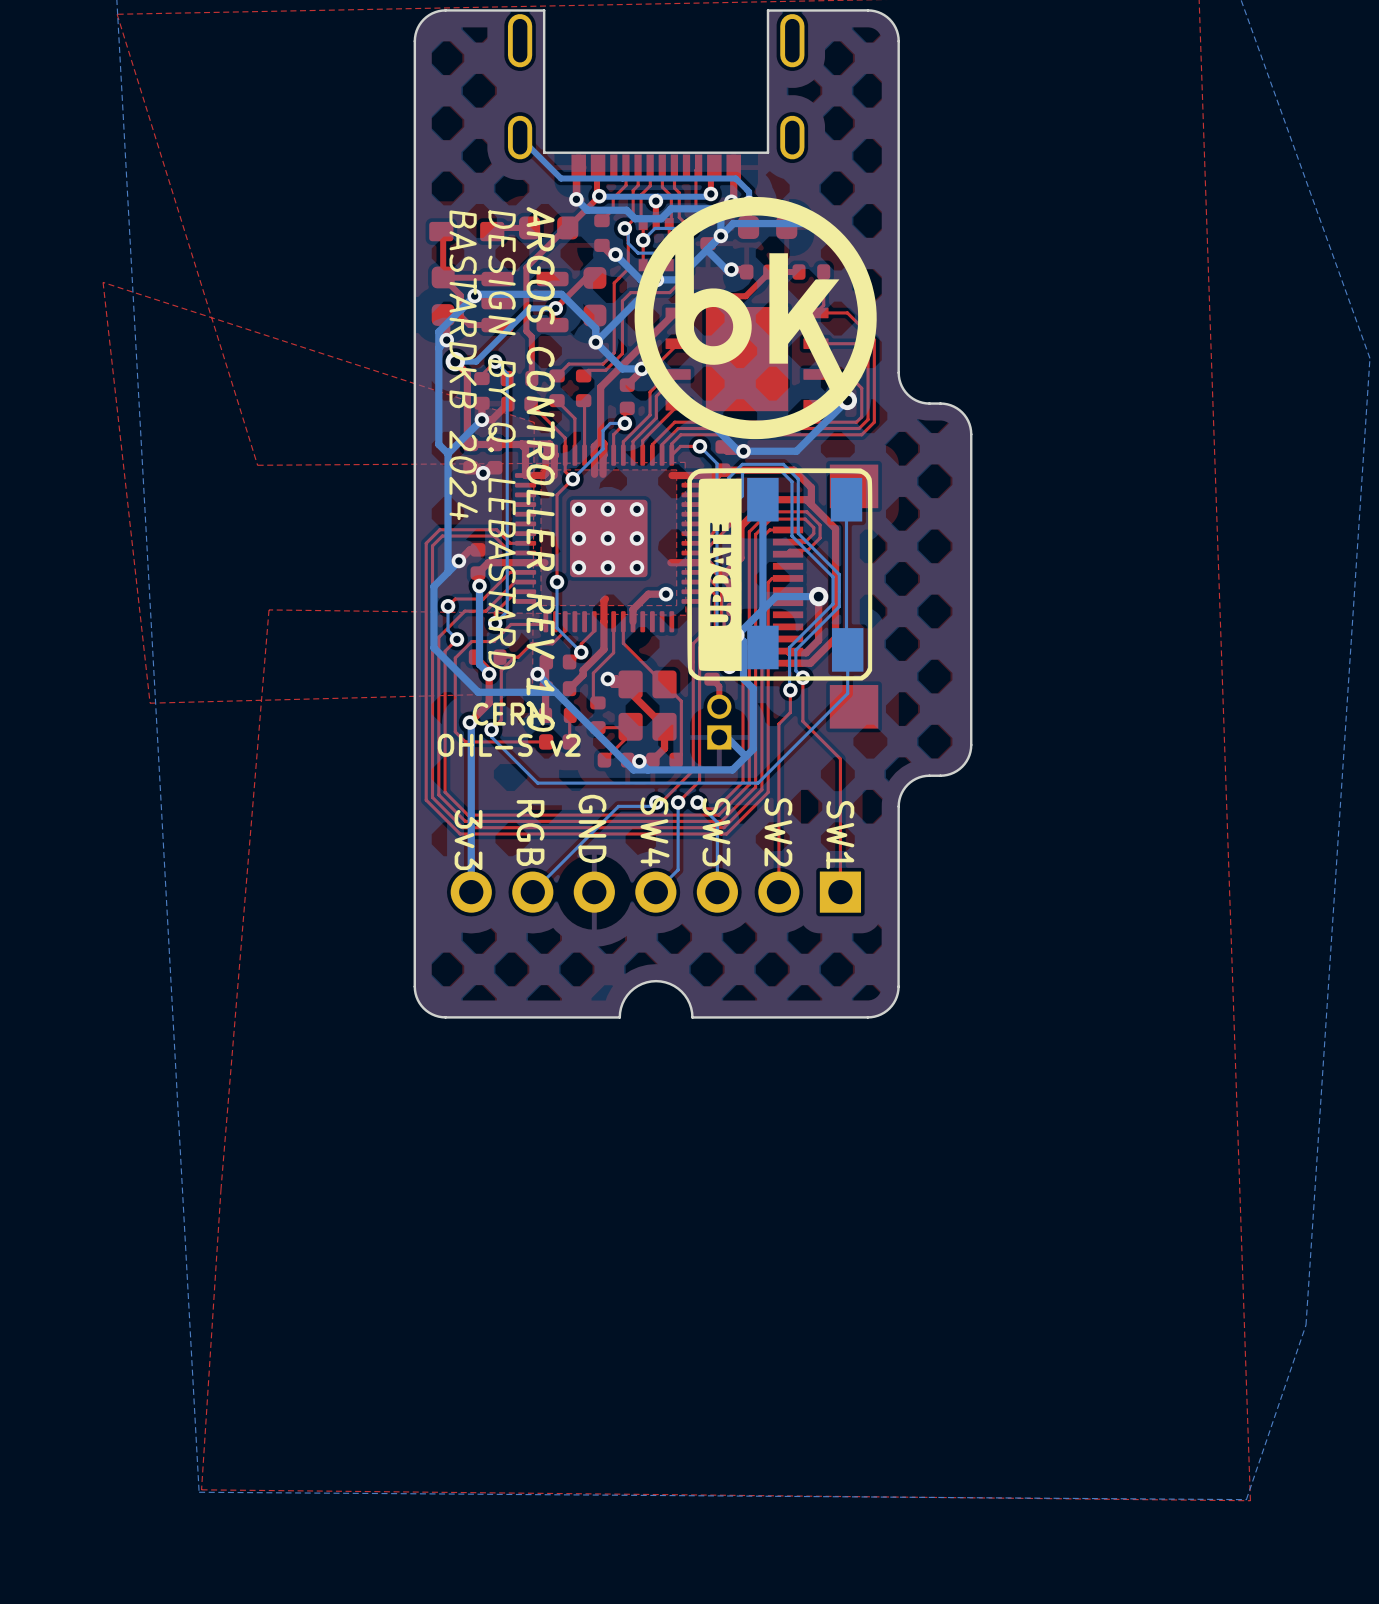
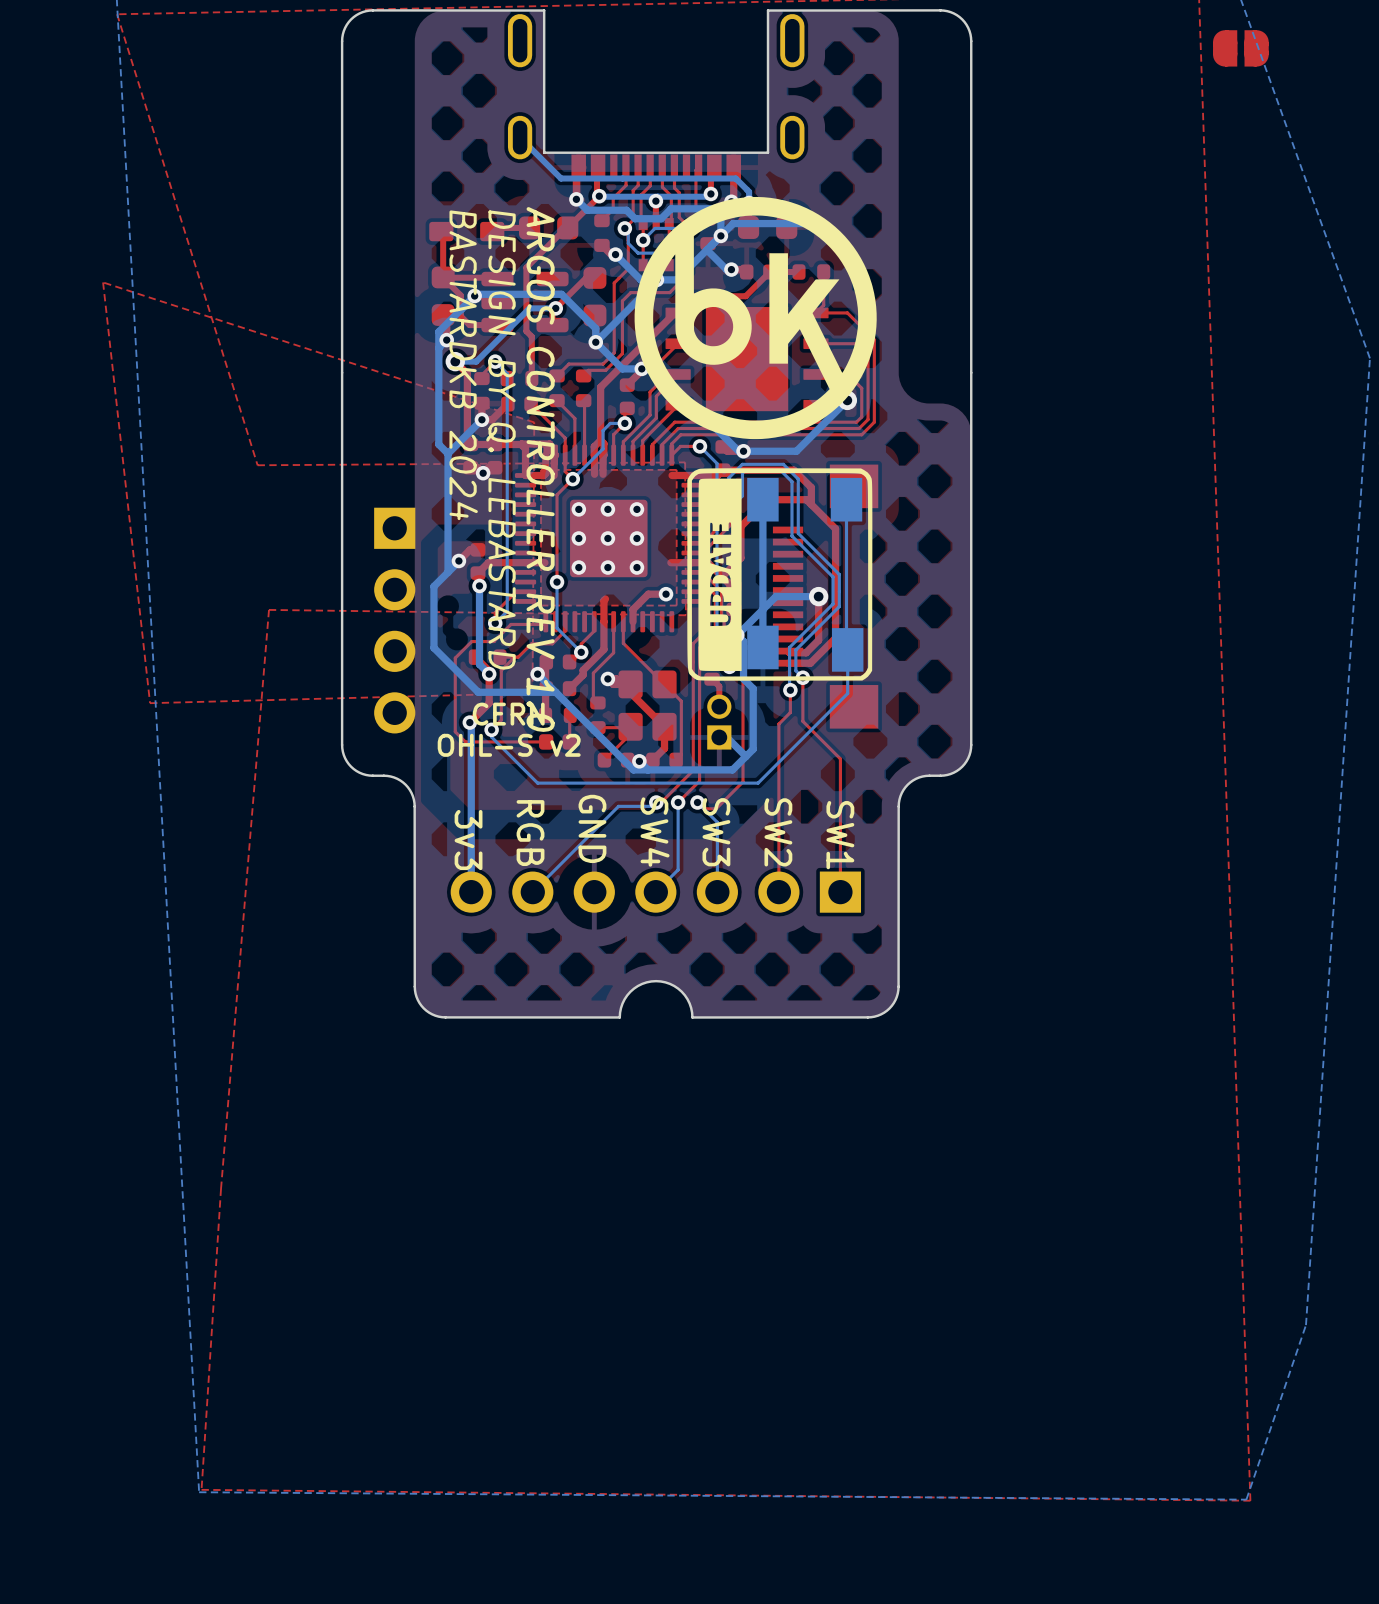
board edge: (544, 10) (438, 11) (429, 15) (421, 21) (415, 37) (414, 986) -> (544, 10) (369, 10) (359, 13) (351, 19) (345, 27) (342, 37) (342, 748) (346, 761) (356, 771) (366, 774) (387, 775) (397, 778) (405, 784) (412, 796) (414, 806) (414, 986)
board edge: (768, 10) (871, 10) (887, 17) (895, 27) (898, 41) (899, 379) (905, 391) (916, 400) (926, 403) (947, 404) (959, 410) (968, 420) (971, 434) -> (768, 10) (943, 10) (959, 17) (968, 27) (971, 41) (971, 434)
part: none -> (1240, 48)
top track: (788, 529) (769, 529) (761, 537) (761, 789) (723, 827) (462, 827) (432, 797) (432, 545) (442, 536) (494, 536) (511, 553) (525, 553) -> none
top track: (788, 542) (805, 542) (813, 533) (813, 527) (805, 519) (770, 519) (755, 534) (755, 787) (721, 821) (465, 821) (438, 794) (438, 637) (464, 611) (485, 611) (514, 582) (525, 582) -> none
top track: (525, 543) (510, 543) (496, 529) (439, 529) (426, 543) (426, 800) (460, 833) (726, 833) (768, 792) (768, 582) (772, 578) (788, 578) -> none
top track: (788, 554) (789, 550) (807, 550) (820, 538) (820, 525) (806, 511) (769, 511) (749, 531) (749, 784) (718, 815) (467, 815) (445, 792) (445, 651) (456, 639) -> none
top track: (525, 572) (510, 572) (483, 599) (455, 599) (448, 606) -> none
bottom track: (448, 606) (448, 630) (456, 639) -> none
via: (448, 606) -> none
part: none -> (394, 620)
via: (456, 639) -> none

